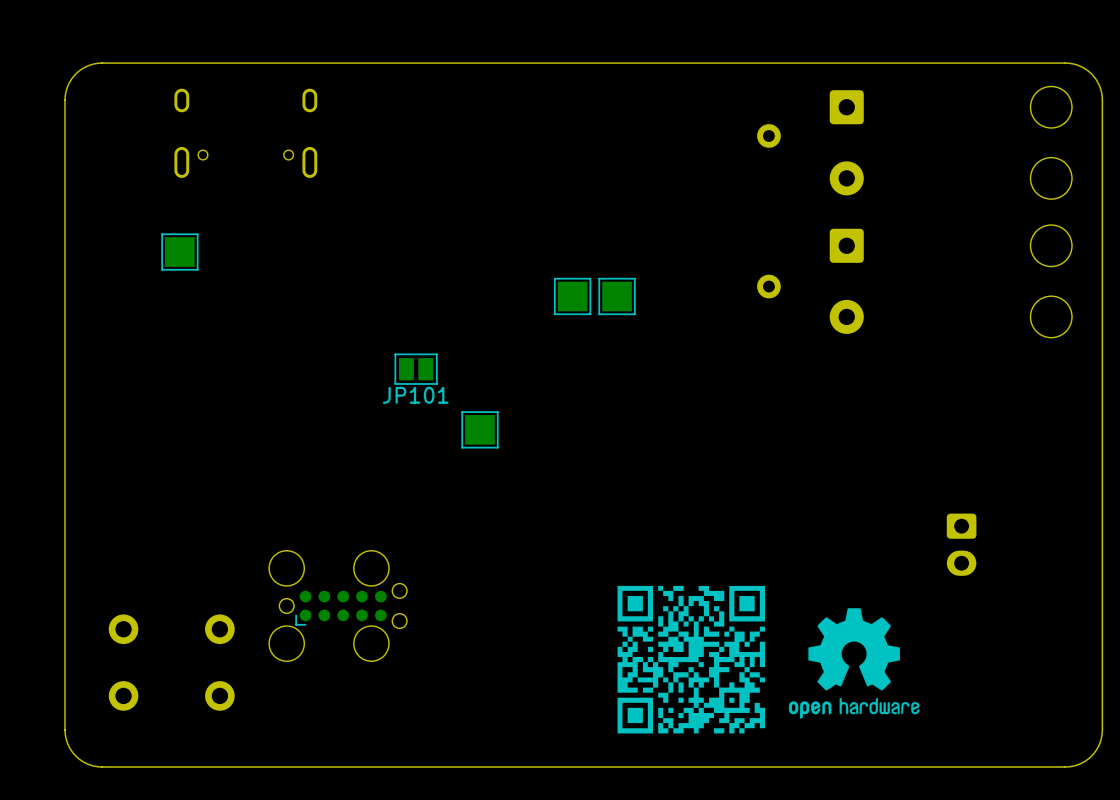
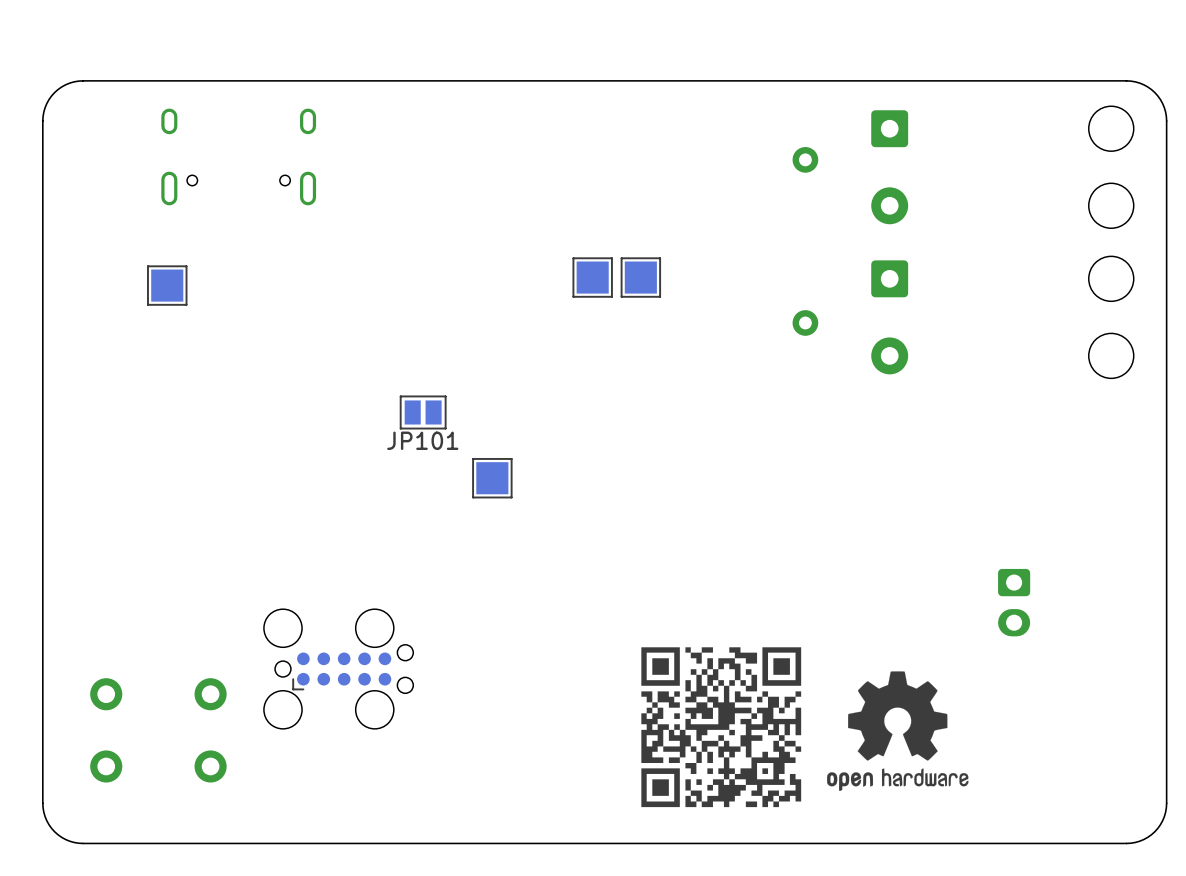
part: none -> (592, 277)
part: none -> (640, 277)
part: (572, 296) -> none
part: (617, 296) -> none

